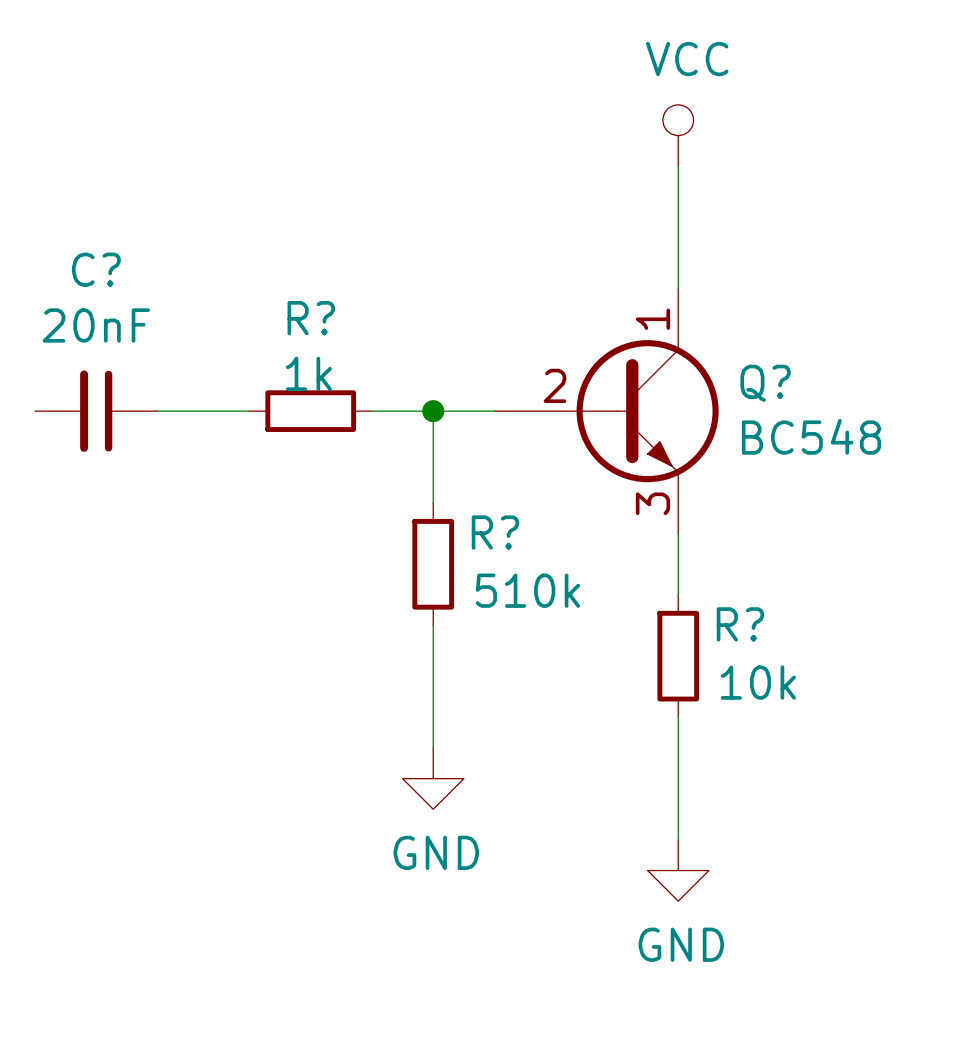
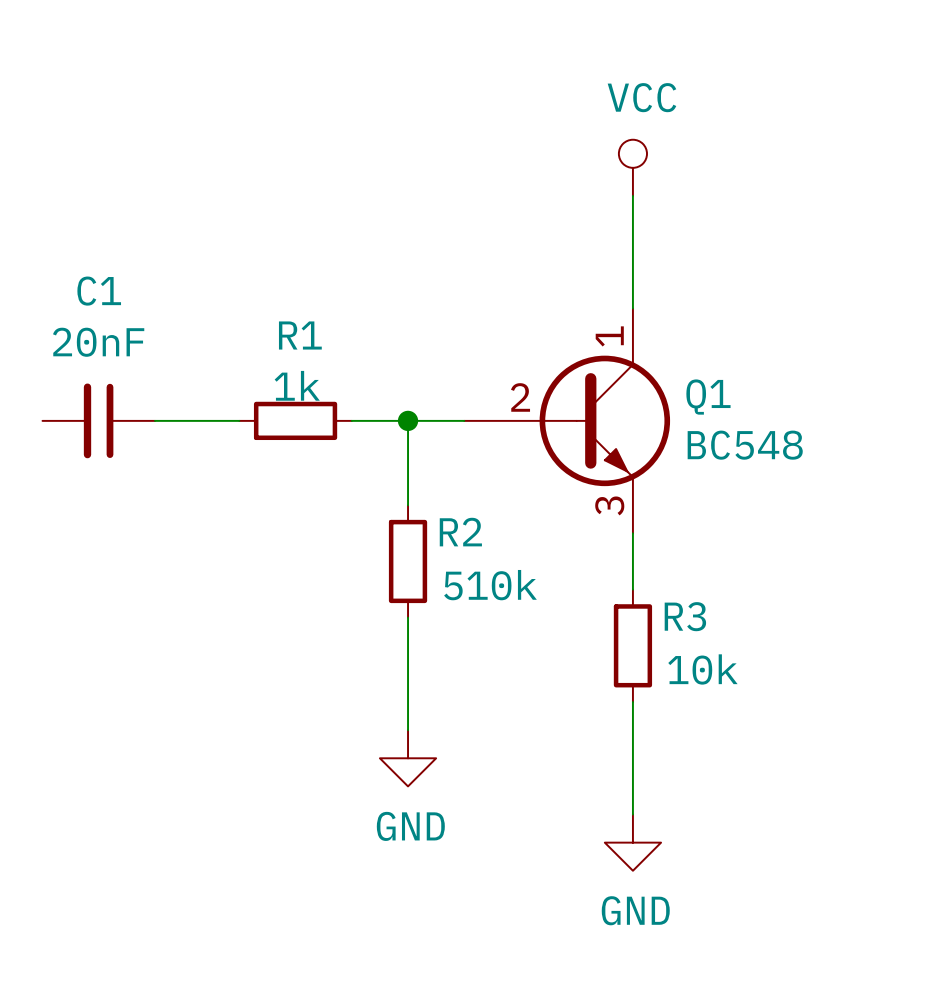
C? name: C? (96, 269) -> C1 (99, 291)
R? name: R? (311, 318) -> R1 (300, 335)
Q? name: Q? (765, 383) -> Q1 (708, 397)
R? name: R? (495, 532) -> R2 (460, 532)
R? name: R? (740, 624) -> R3 (685, 616)

